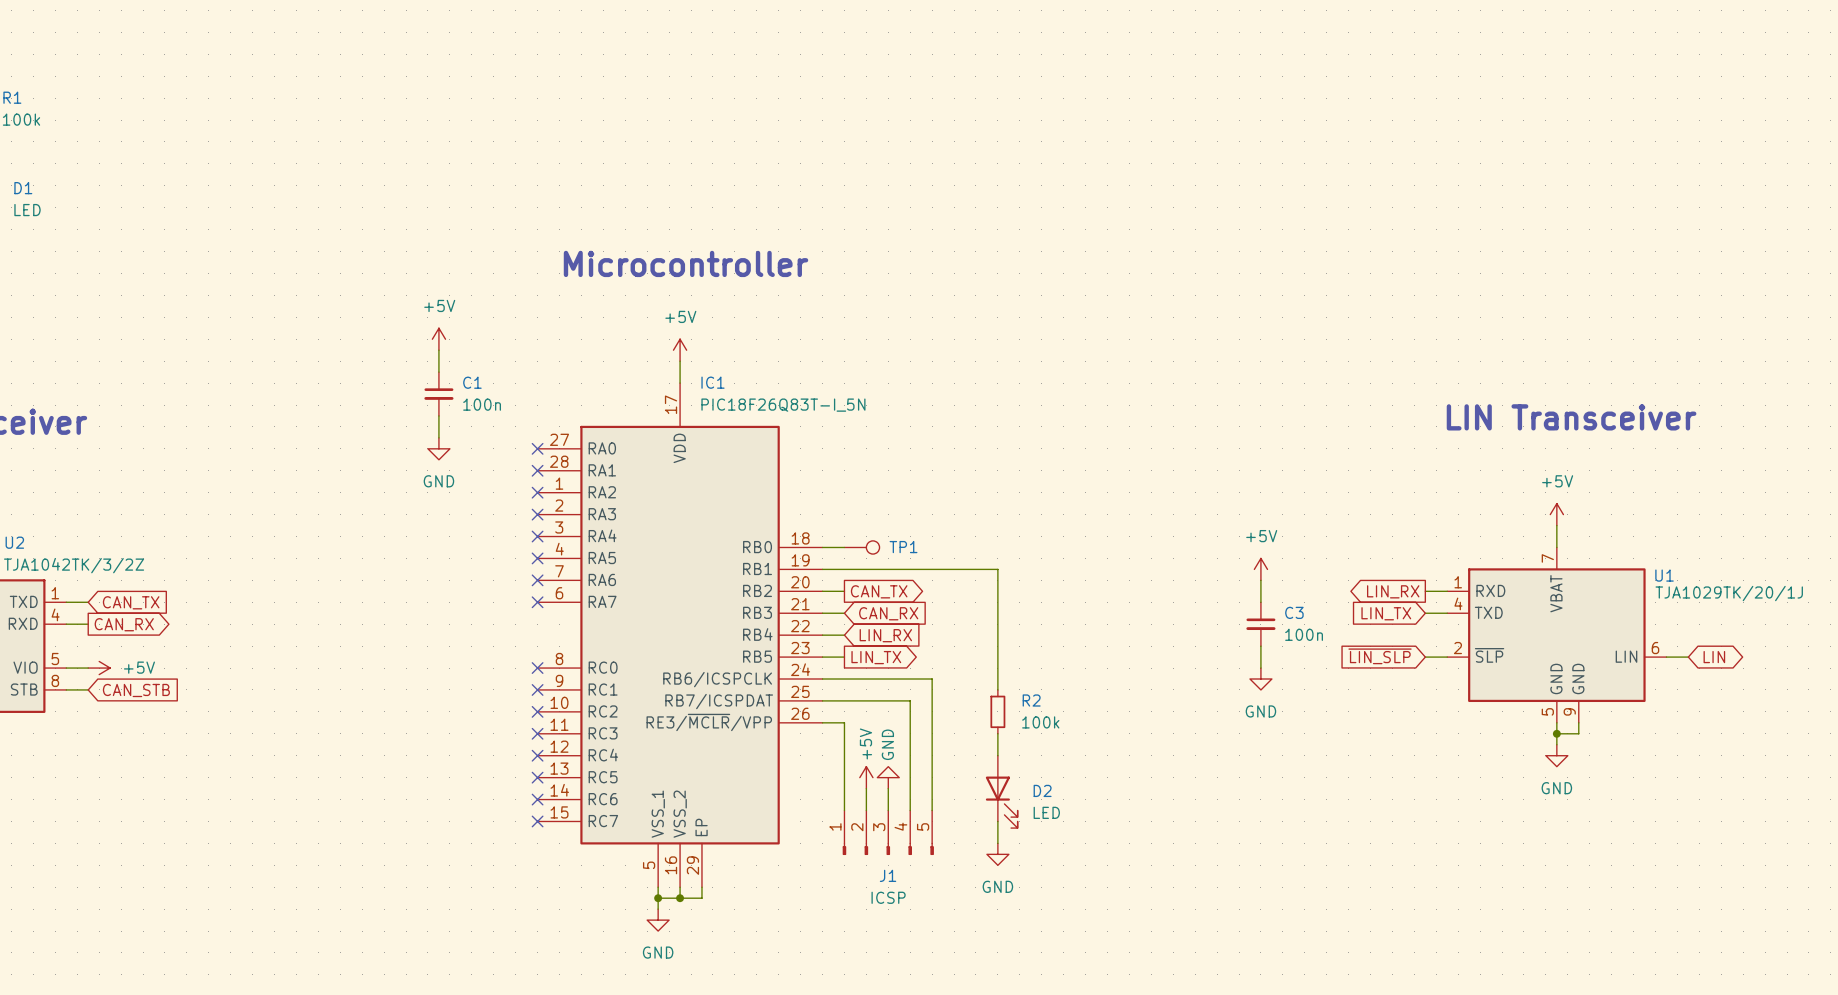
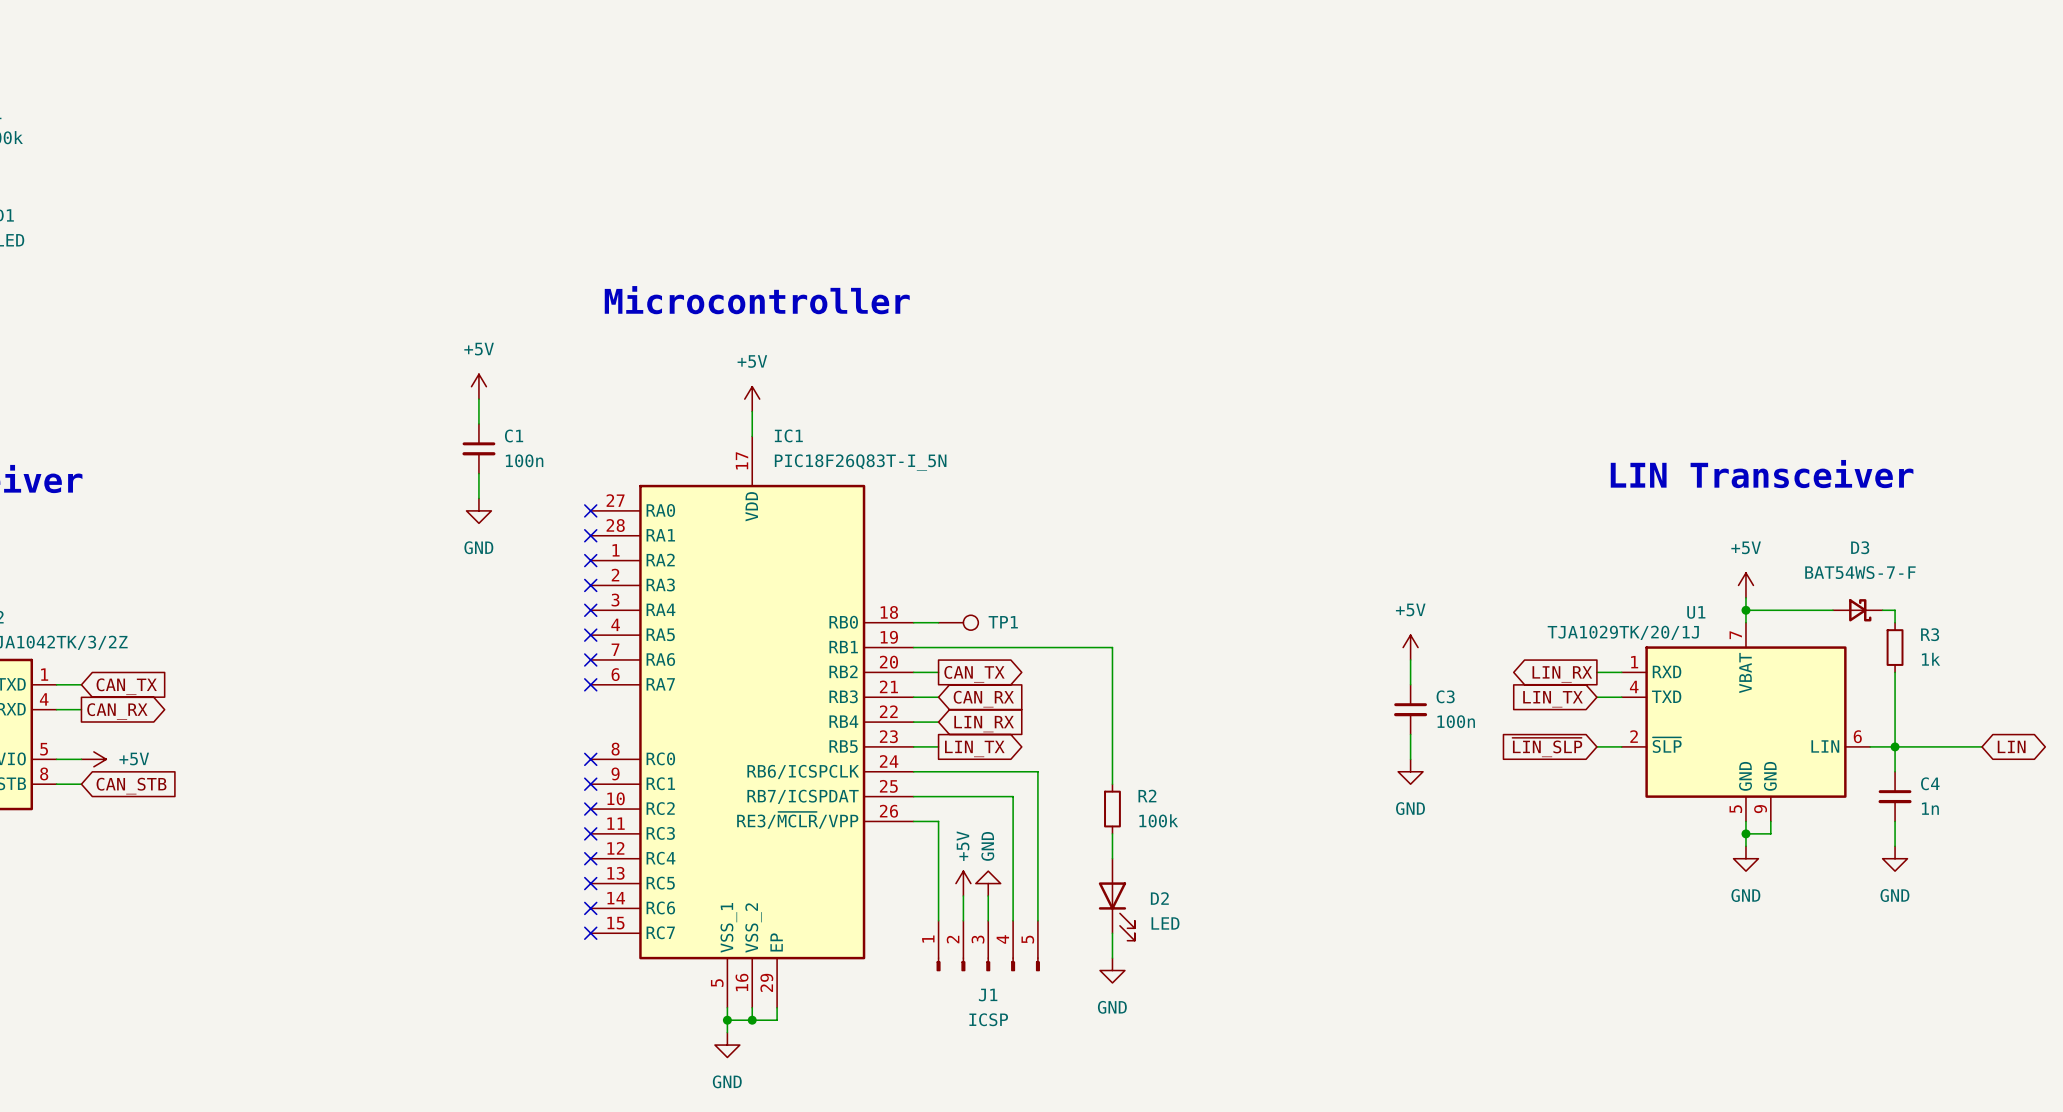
wire: none -> (1745, 610) (1832, 610)
junction: none -> (1745, 610)
D3: none -> BAT54WS-7-F (1857, 610)
wire: none -> (1882, 610) (1895, 610) (1895, 622)
R3: none -> 1k (1895, 647)
U1 name position: U1 (1664, 575) -> U1 (1696, 612)
wire: none -> (1895, 672) (1895, 771)
U1 value position: TJA1029TK/20/1J (1729, 593) -> TJA1029TK/20/1J (1623, 632)
wire: none -> (1895, 746) (1981, 746)
junction: none -> (1895, 746)
global label position: LIN (1714, 657) -> LIN (2011, 746)
C4: none -> 1n (1895, 796)
wire: none -> (1895, 821) (1895, 846)
power symbol: none -> GND (1895, 858)

